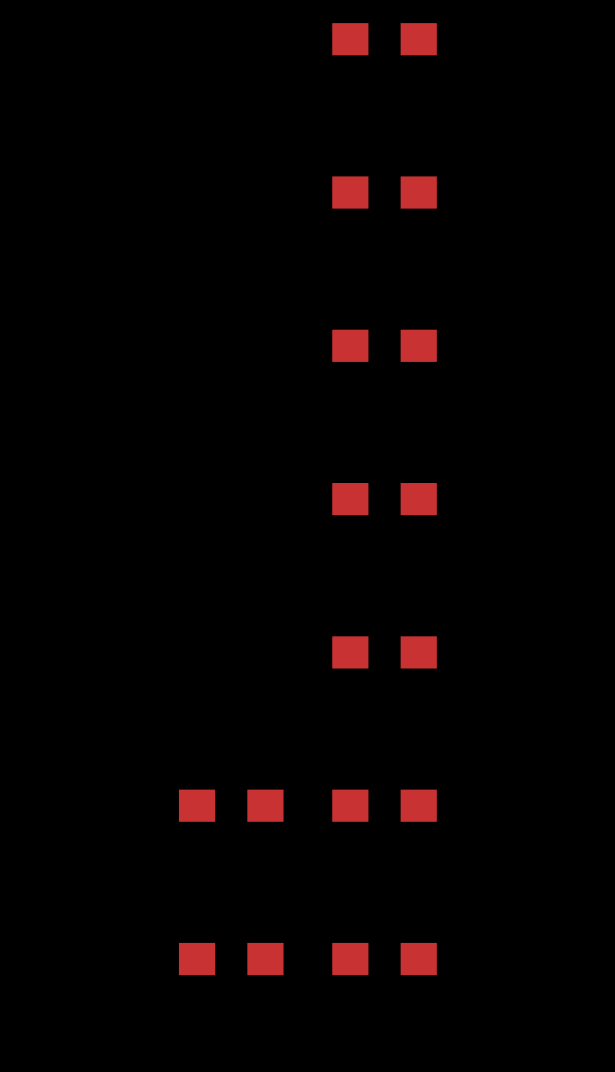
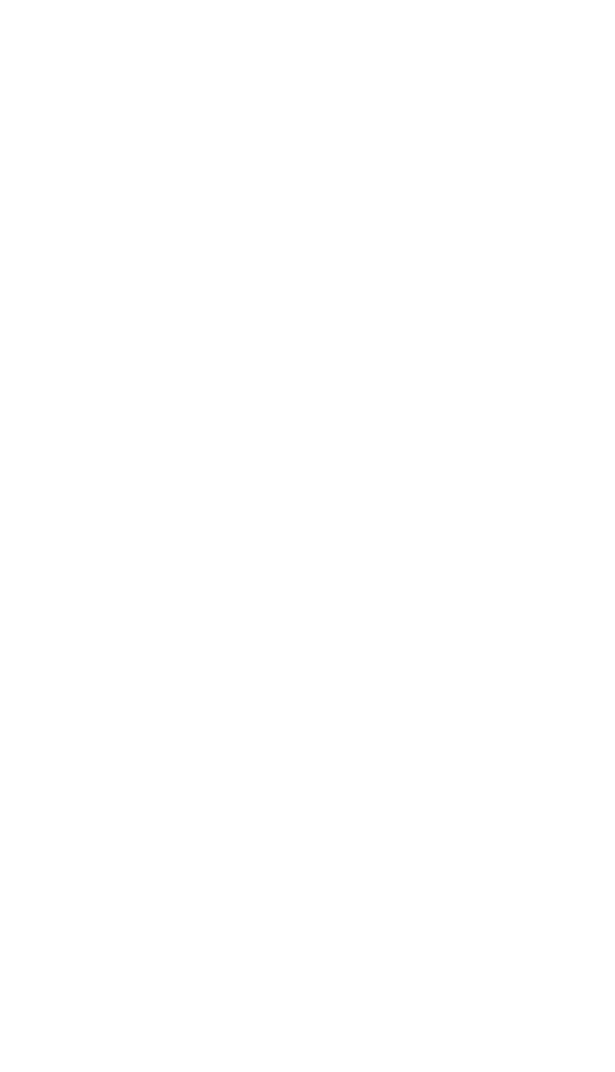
part: (384, 39) -> none
part: (384, 192) -> none
part: (384, 345) -> none
part: (384, 499) -> none
part: (384, 652) -> none
part: (231, 805) -> none
part: (384, 805) -> none
part: (231, 959) -> none
part: (384, 959) -> none

